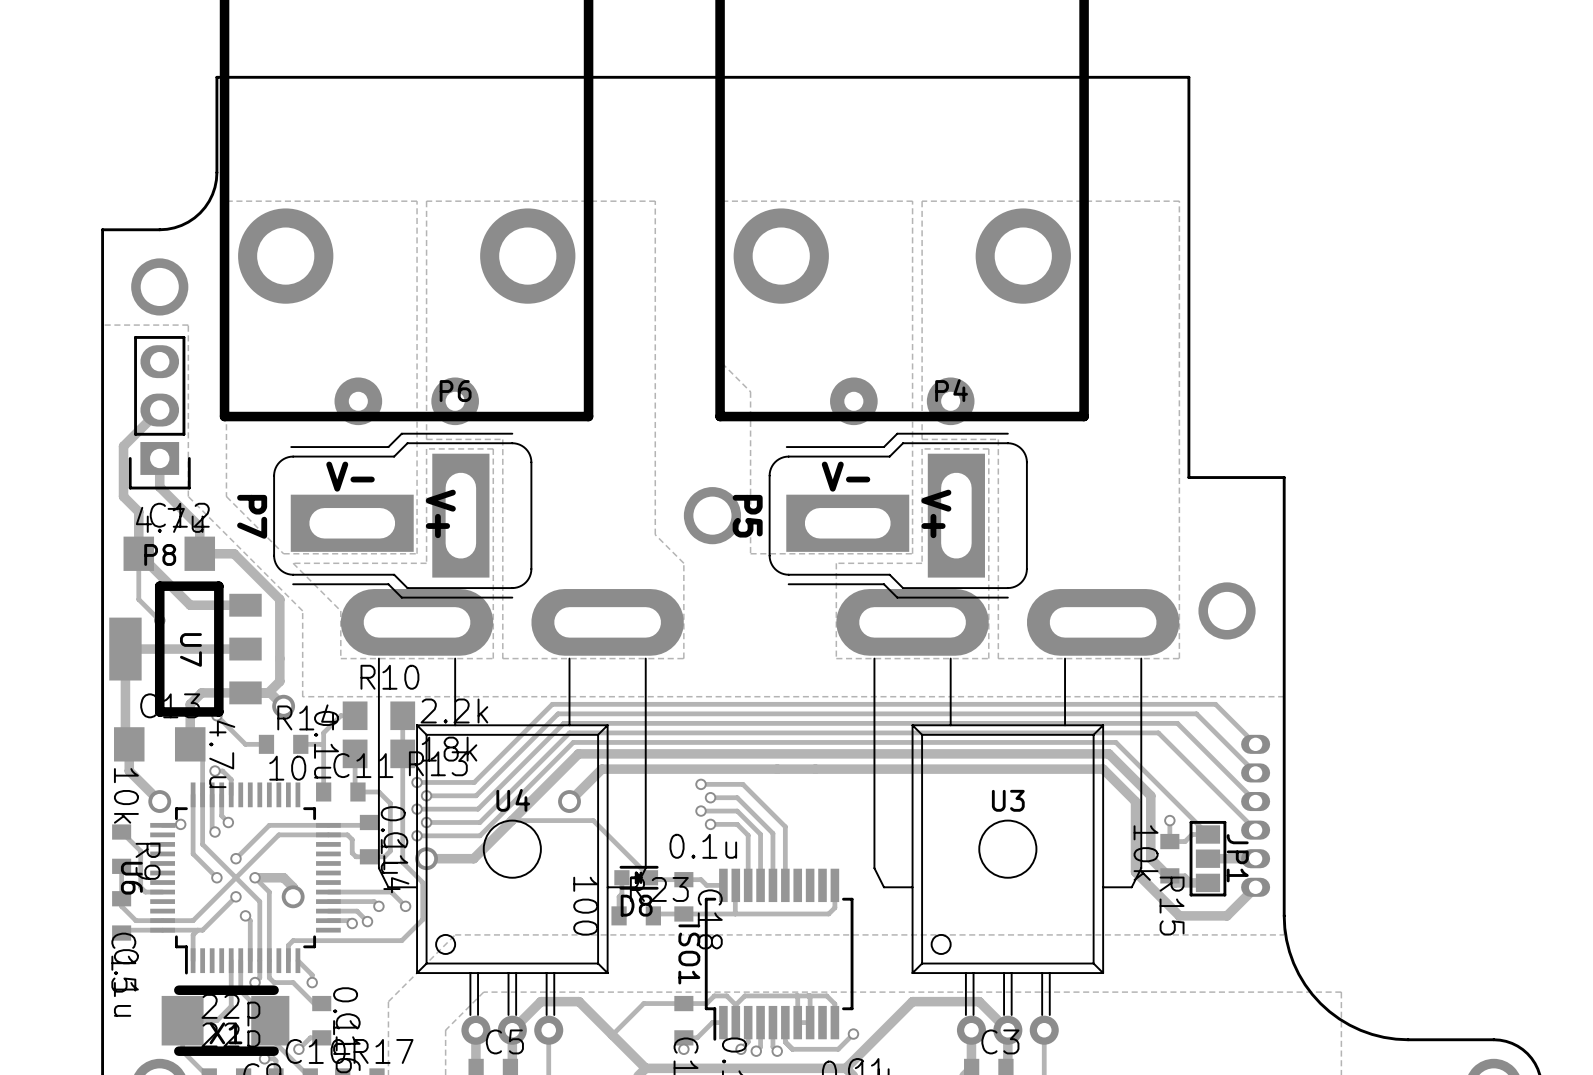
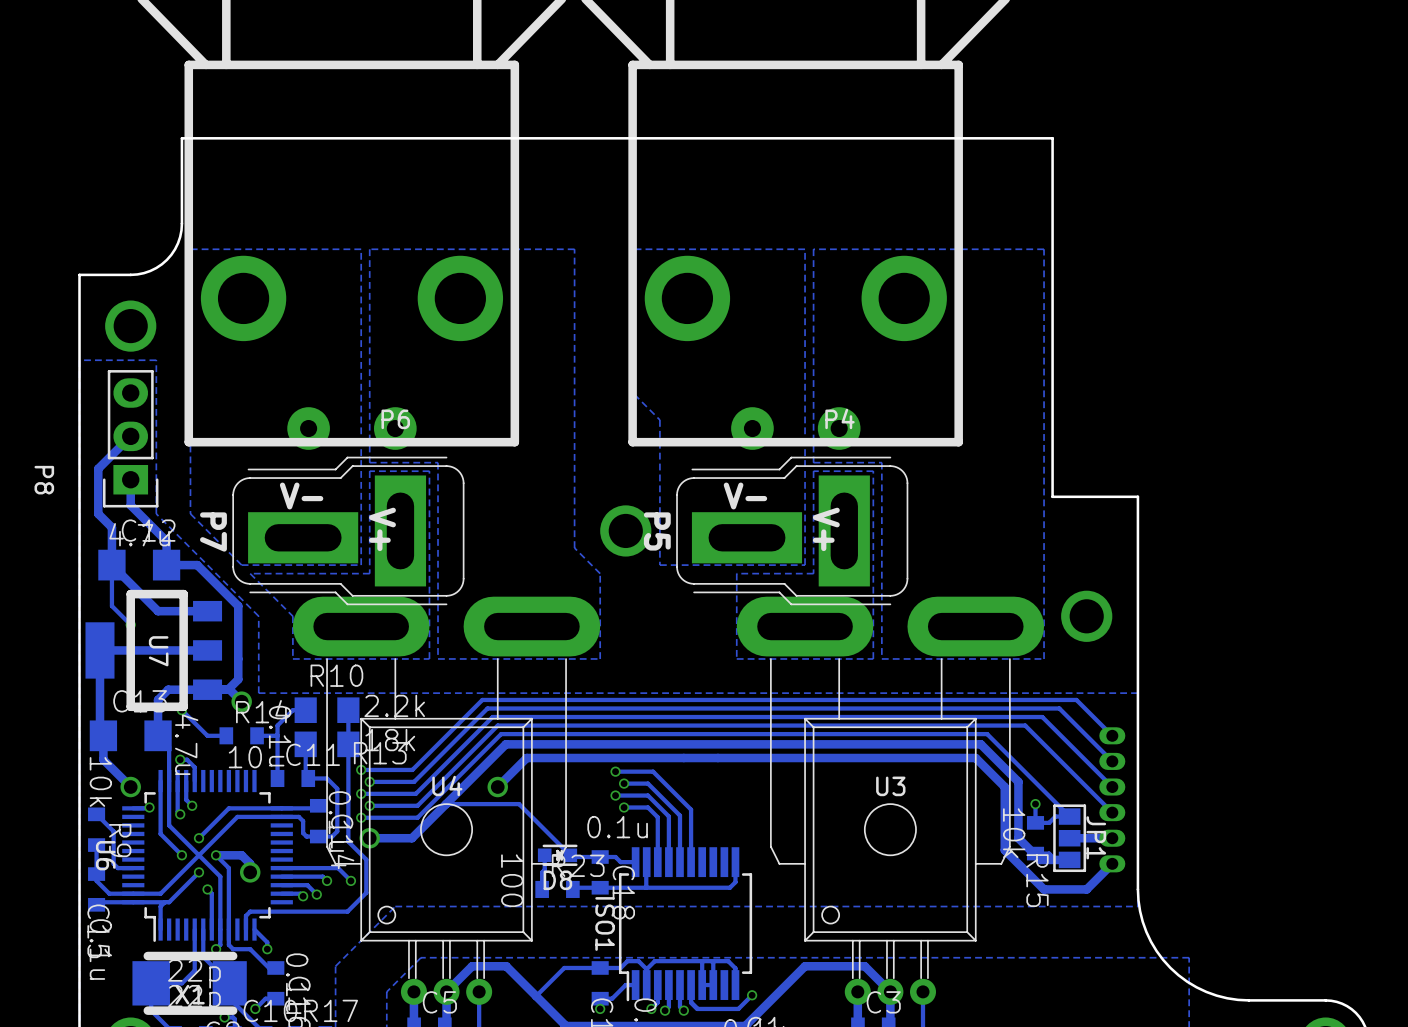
P8 name rotation: 0° (160, 554) -> 90° clockwise (44, 480)
P8 name position: P8 (160, 554) -> P8 (44, 480)

